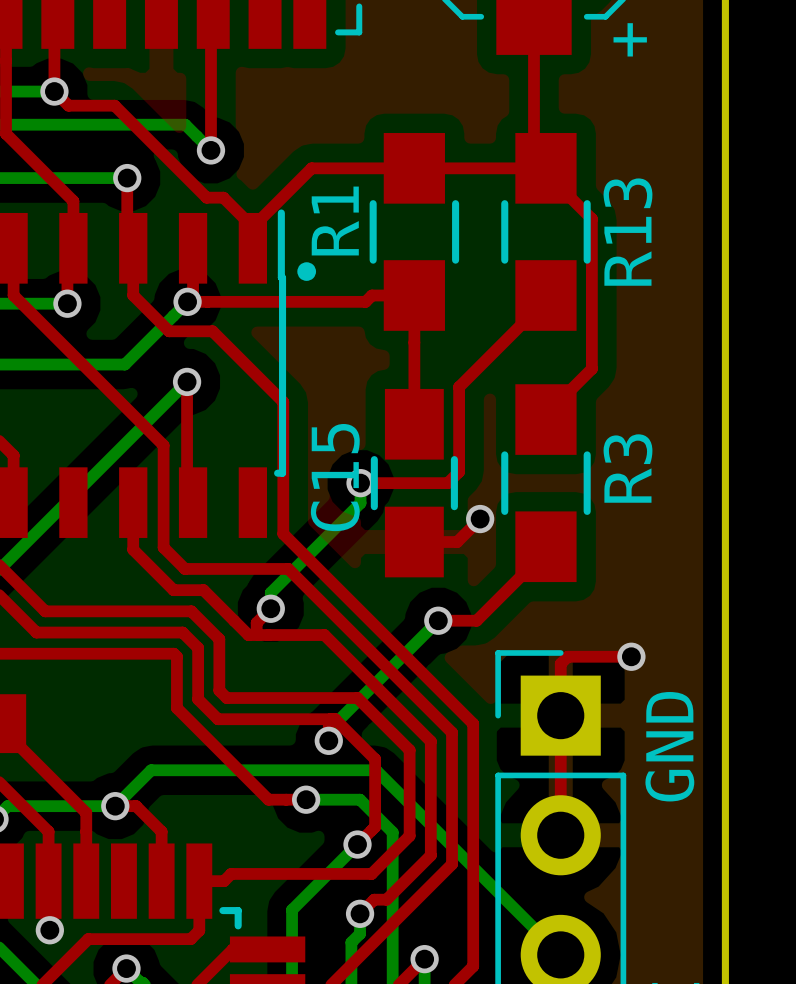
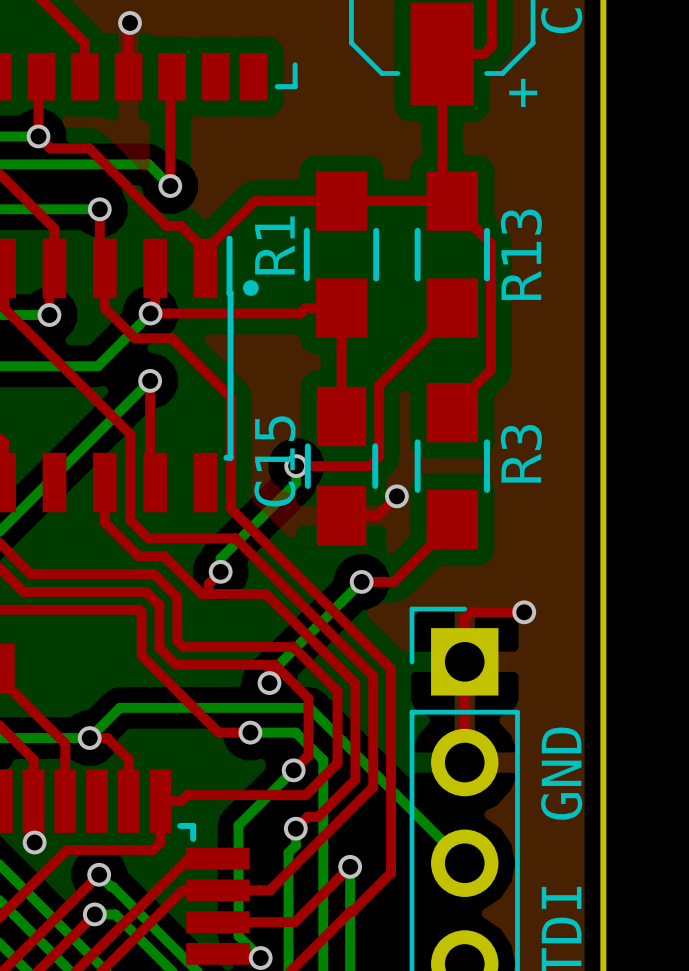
text position: GND (669, 746) -> GND (561, 773)

